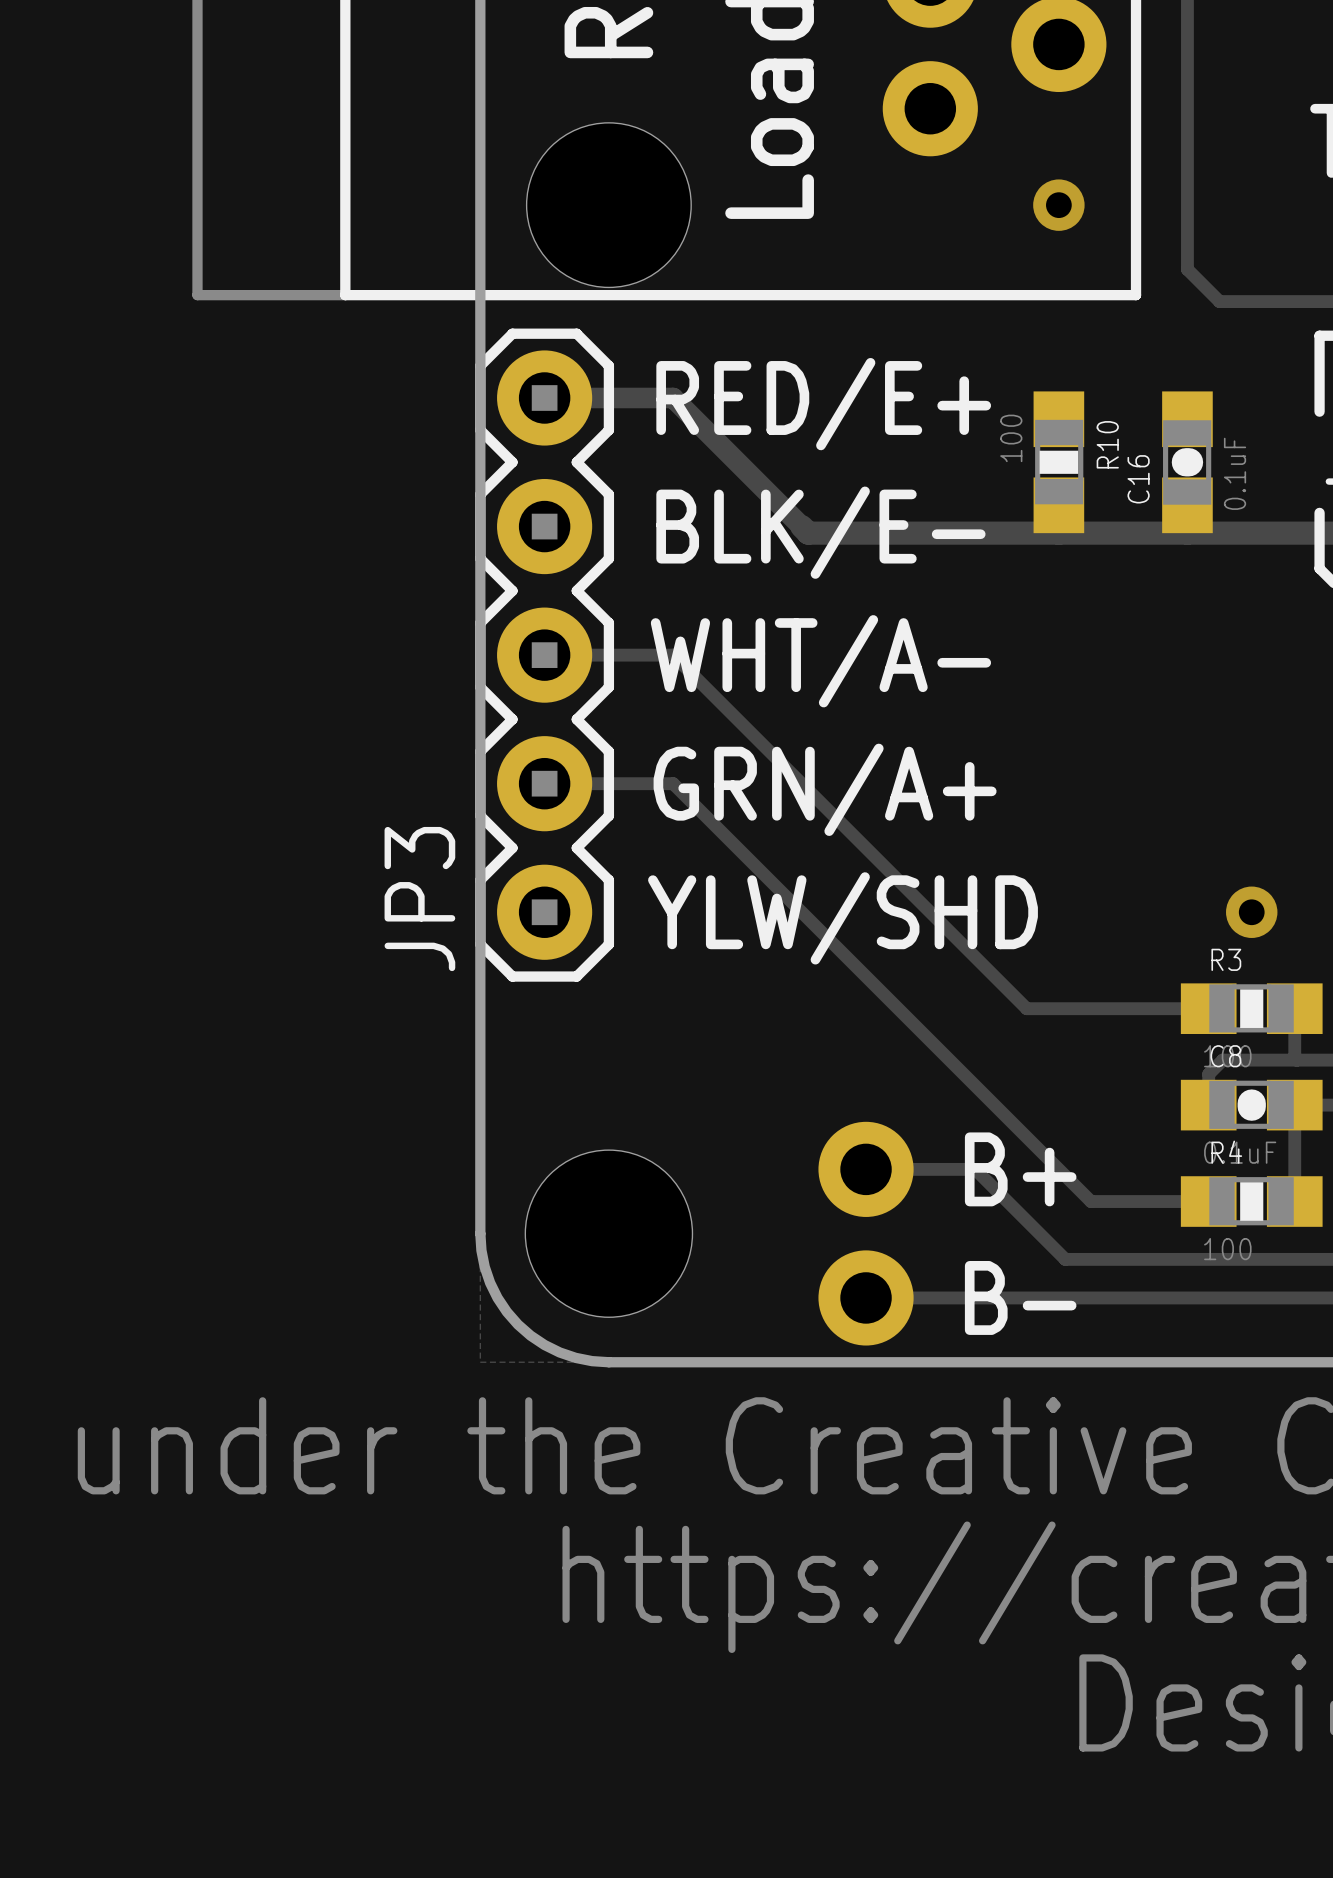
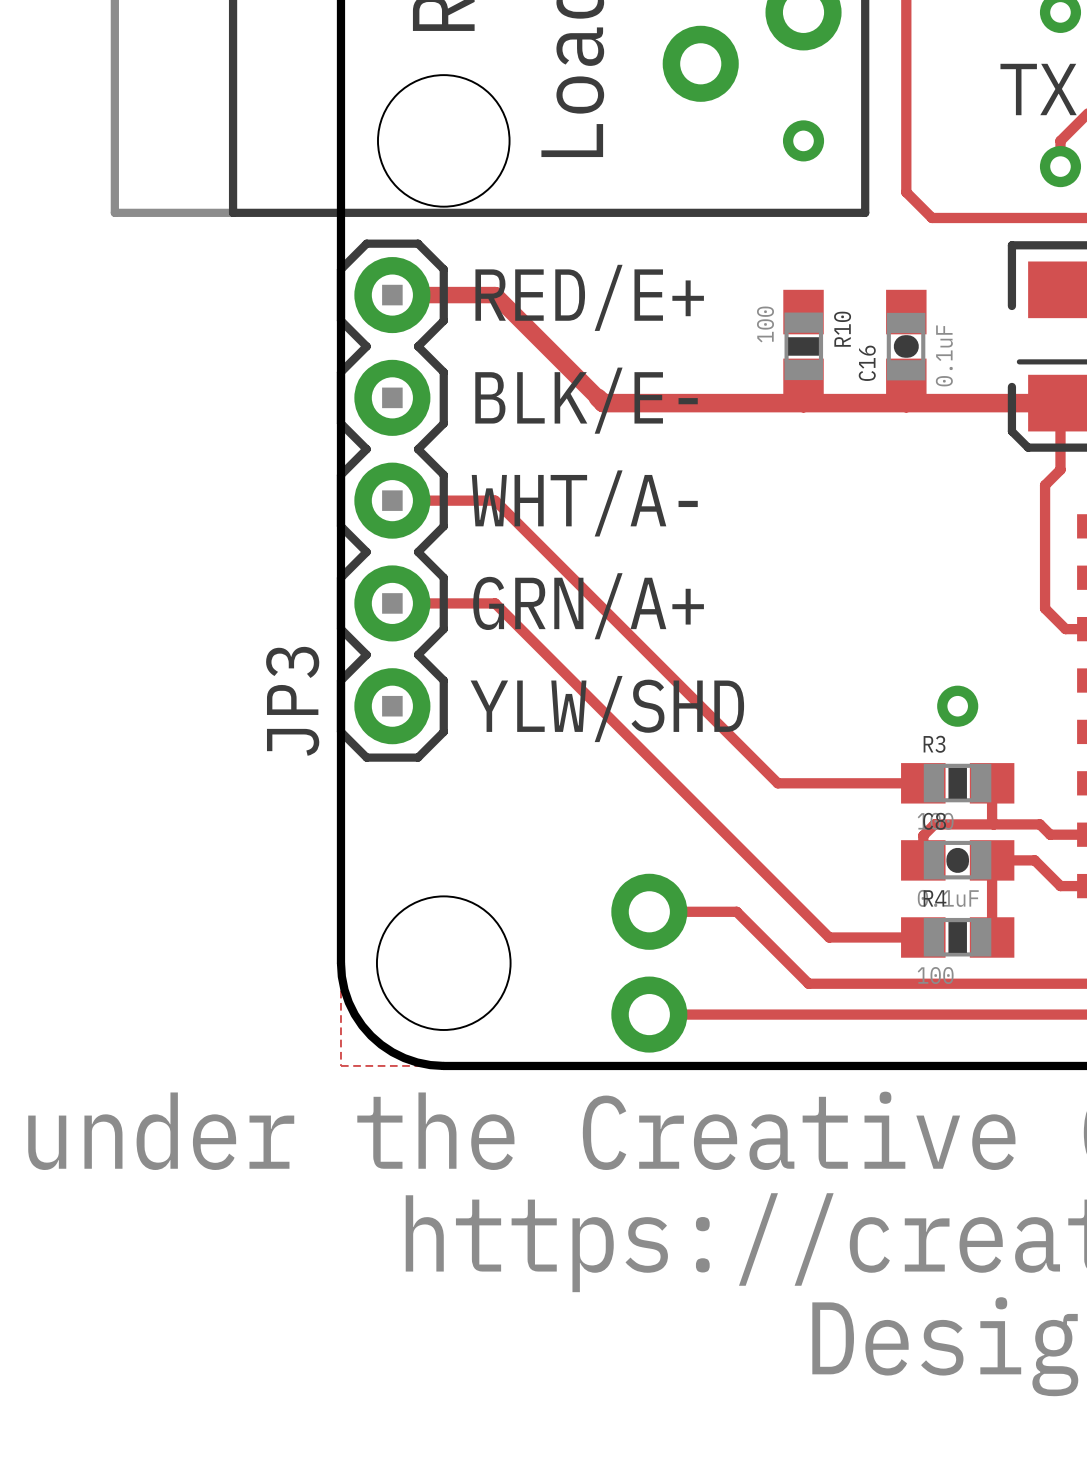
text: B+ (1020, 1169) -> none
text: B- (1020, 1297) -> none

